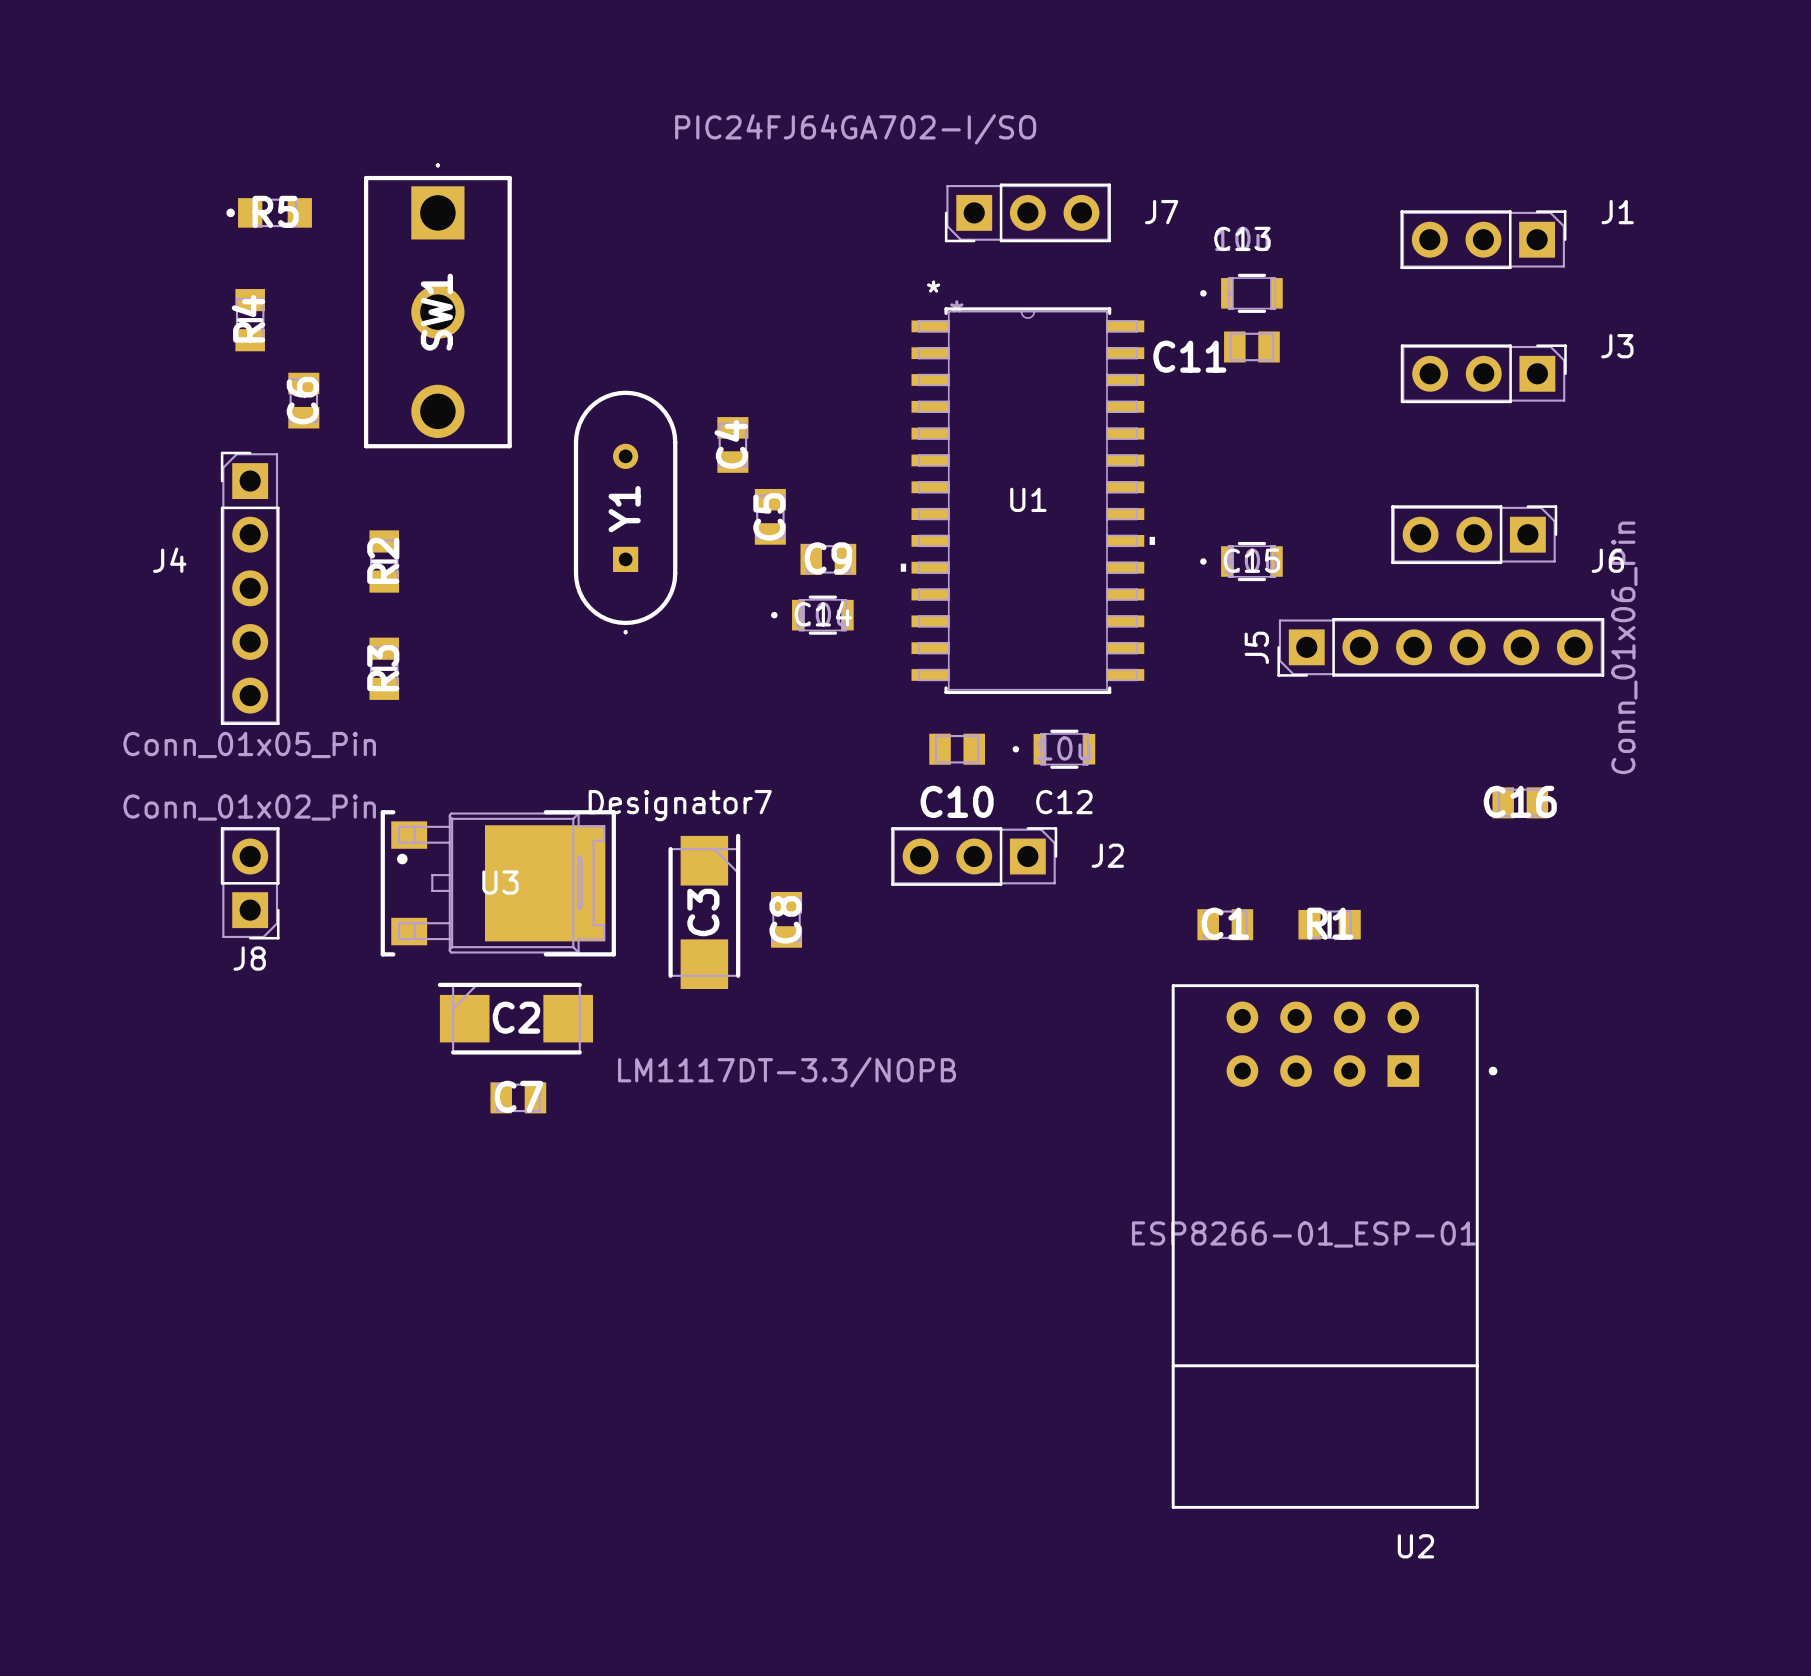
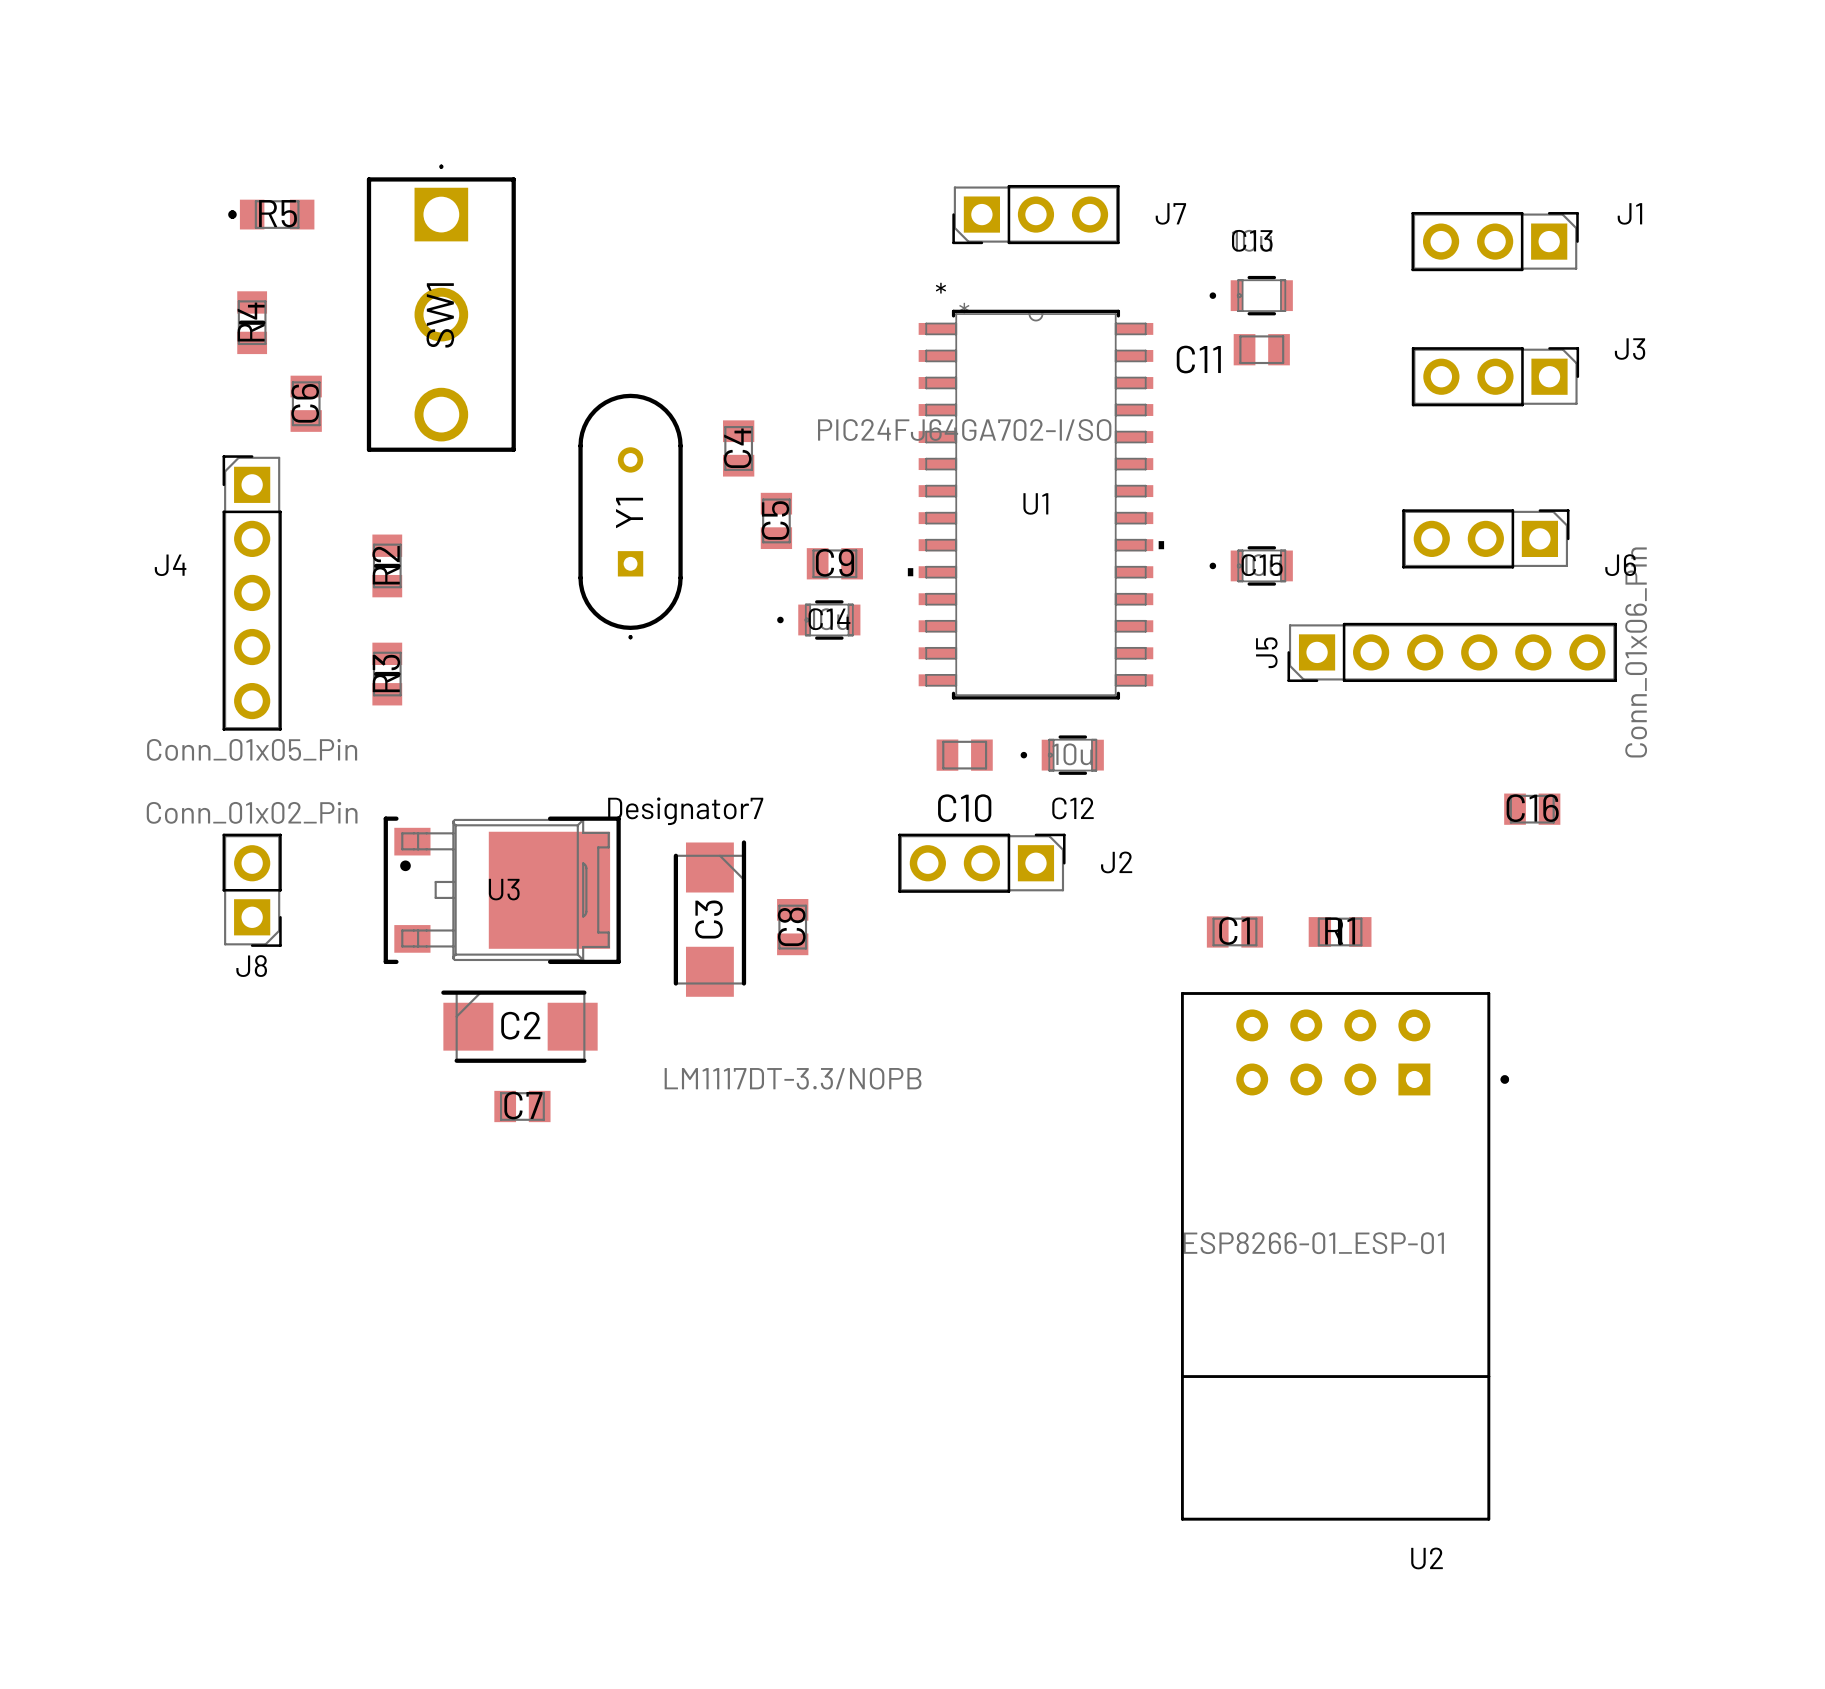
U1 value position: PIC24FJ64GA702-I/SO (855, 129) -> PIC24FJ64GA702-I/SO (964, 430)

